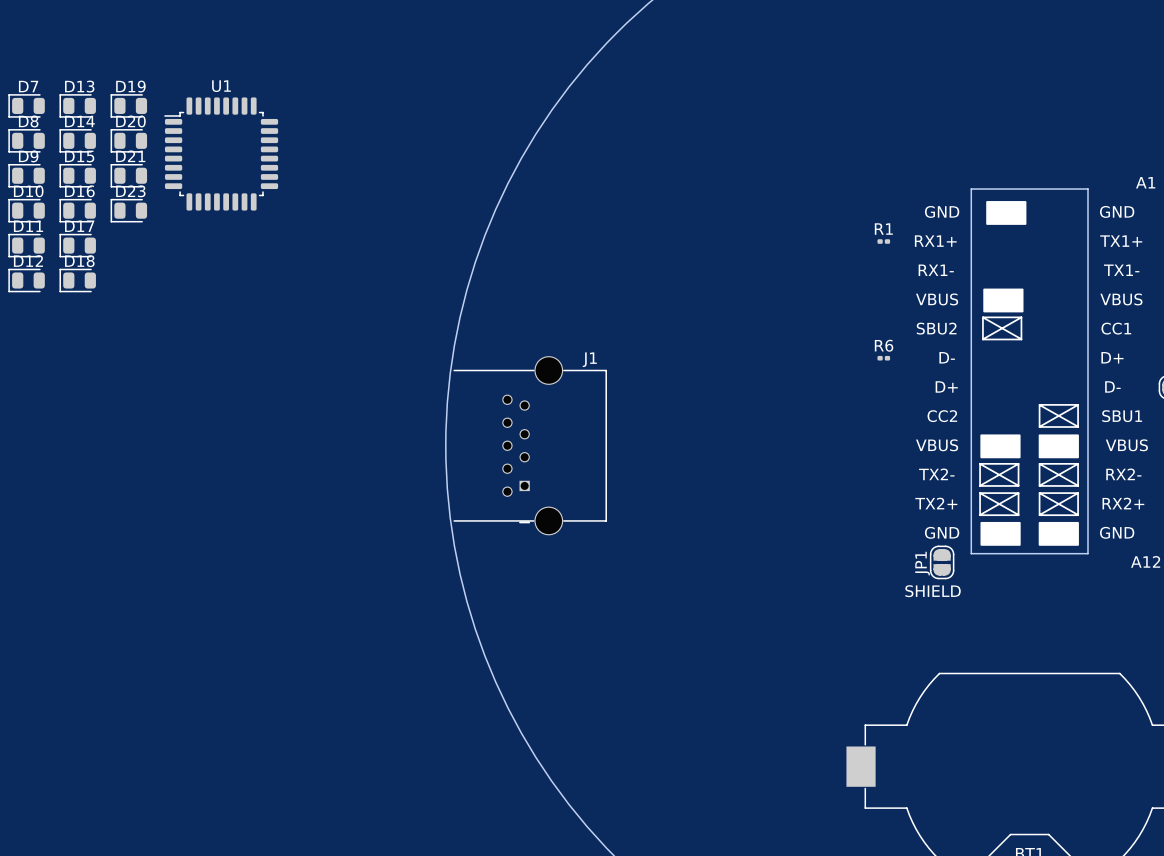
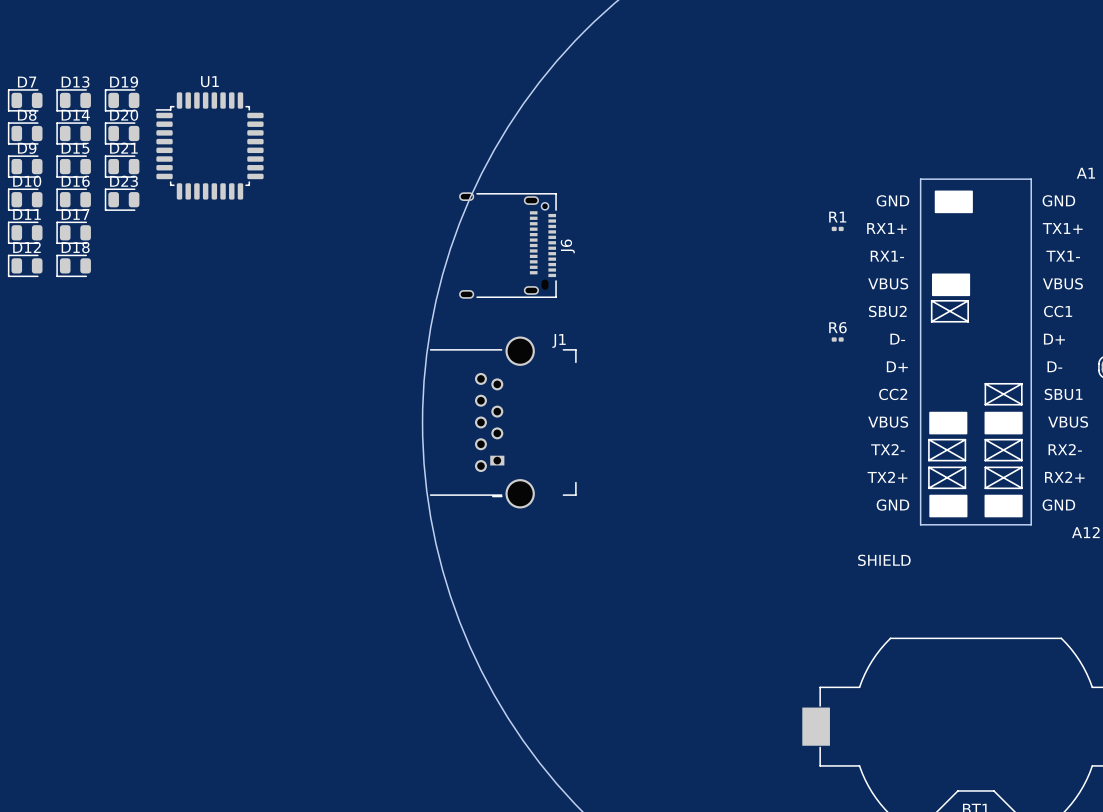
J6: none -> (507, 245)
J1 footprint: [453, 356, 607, 536] -> [429, 336, 577, 509]
JP1: (942, 562) -> none

